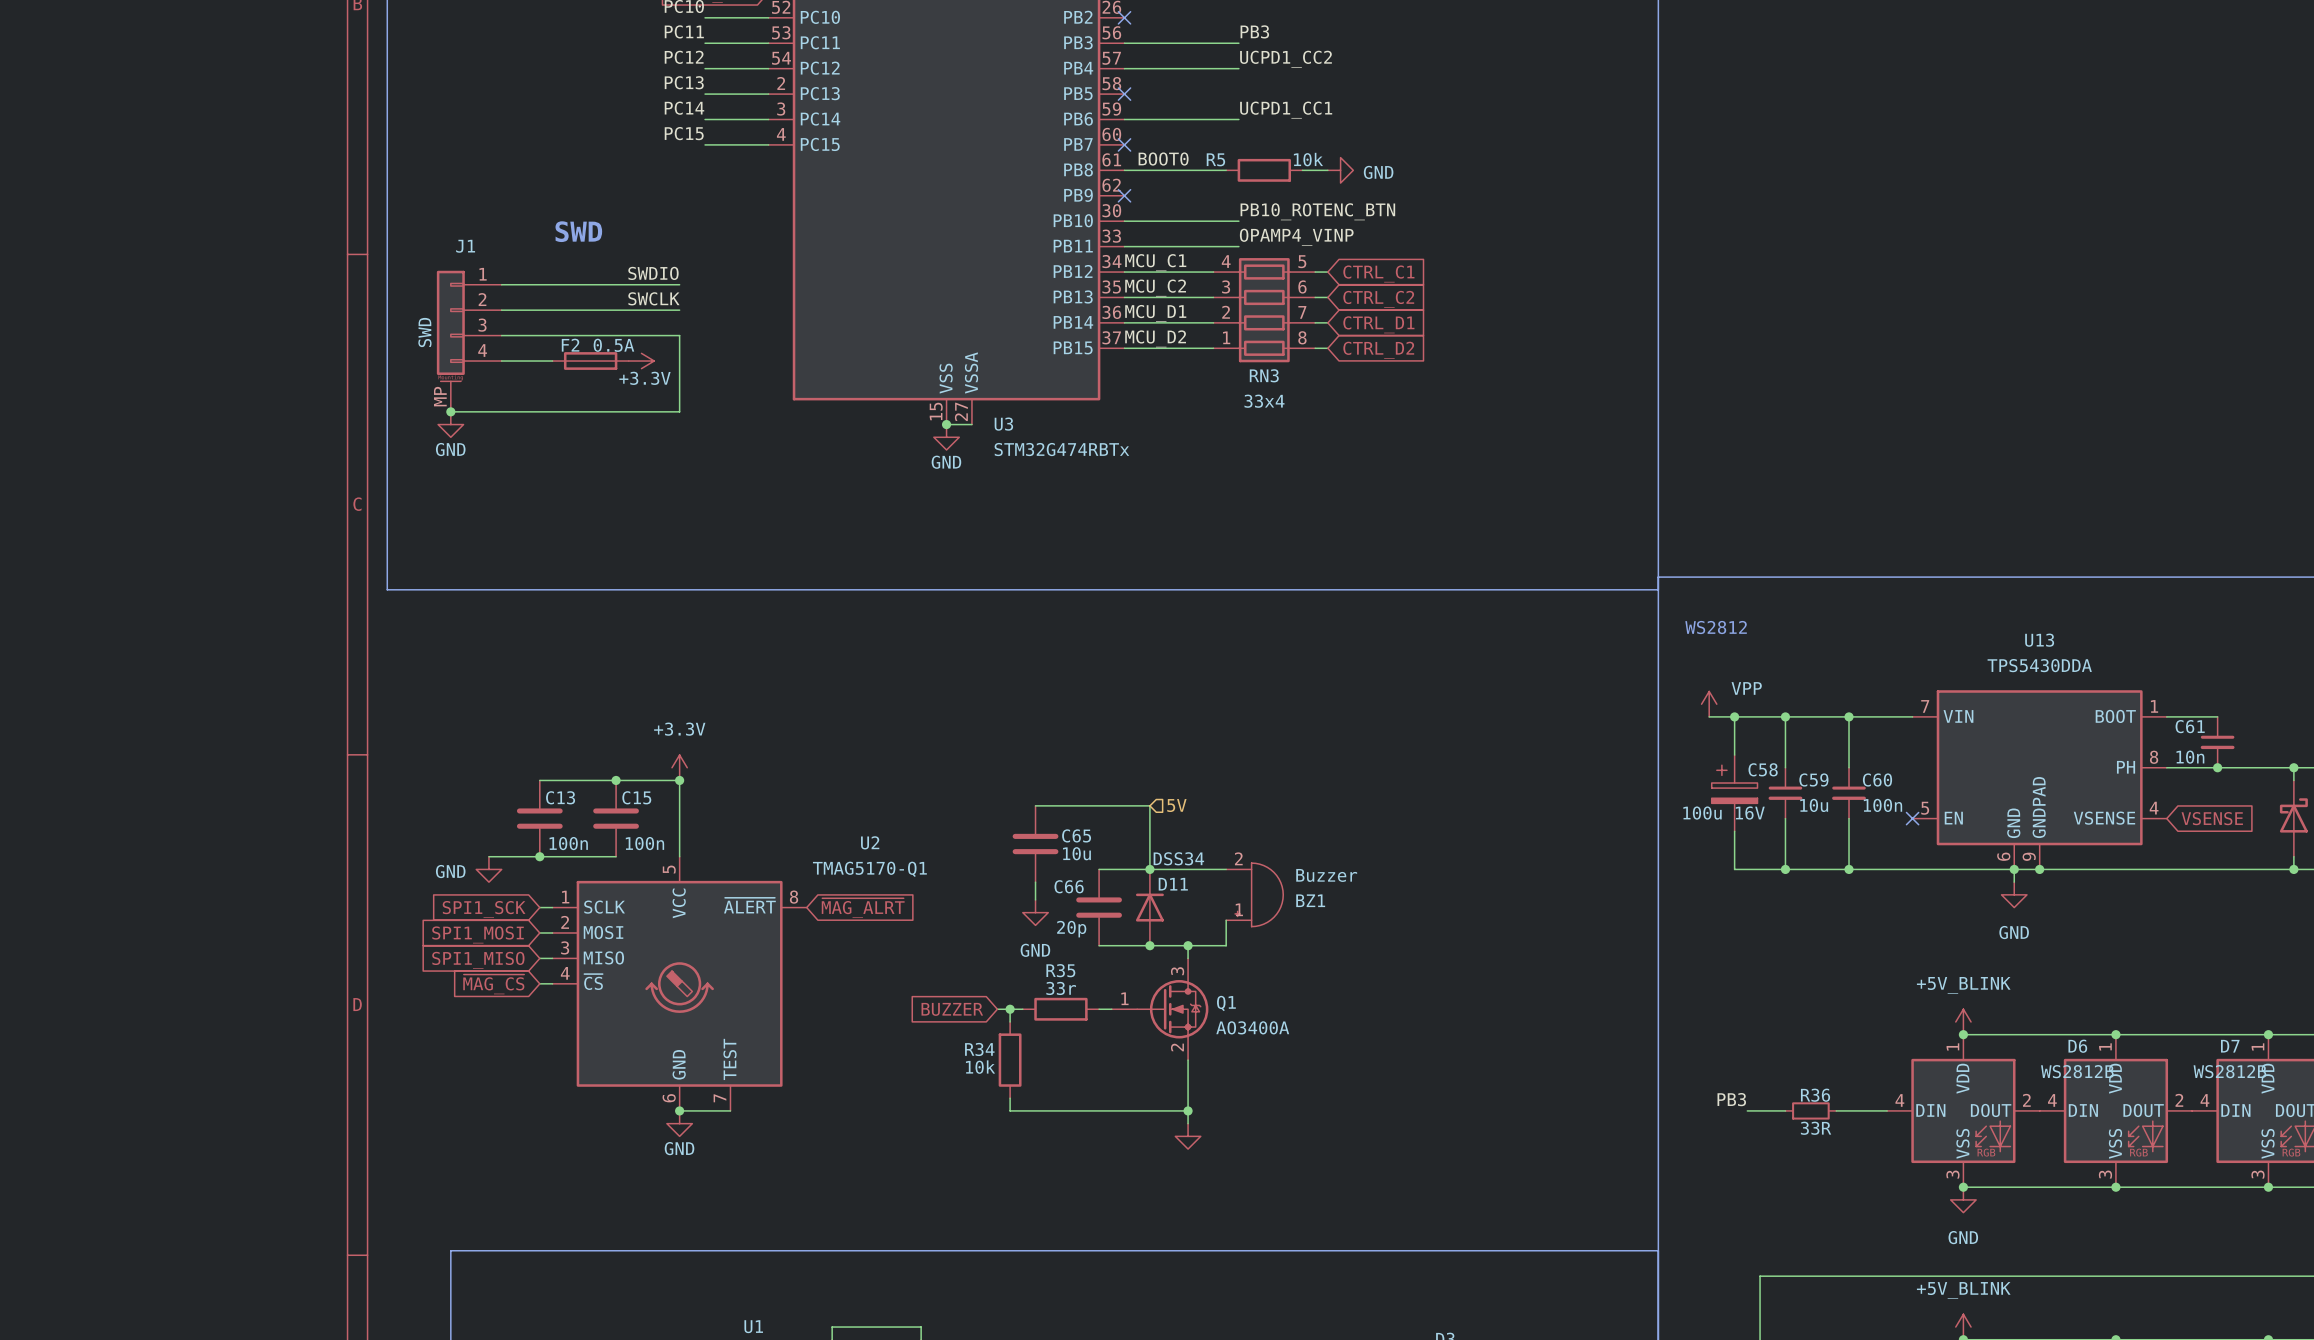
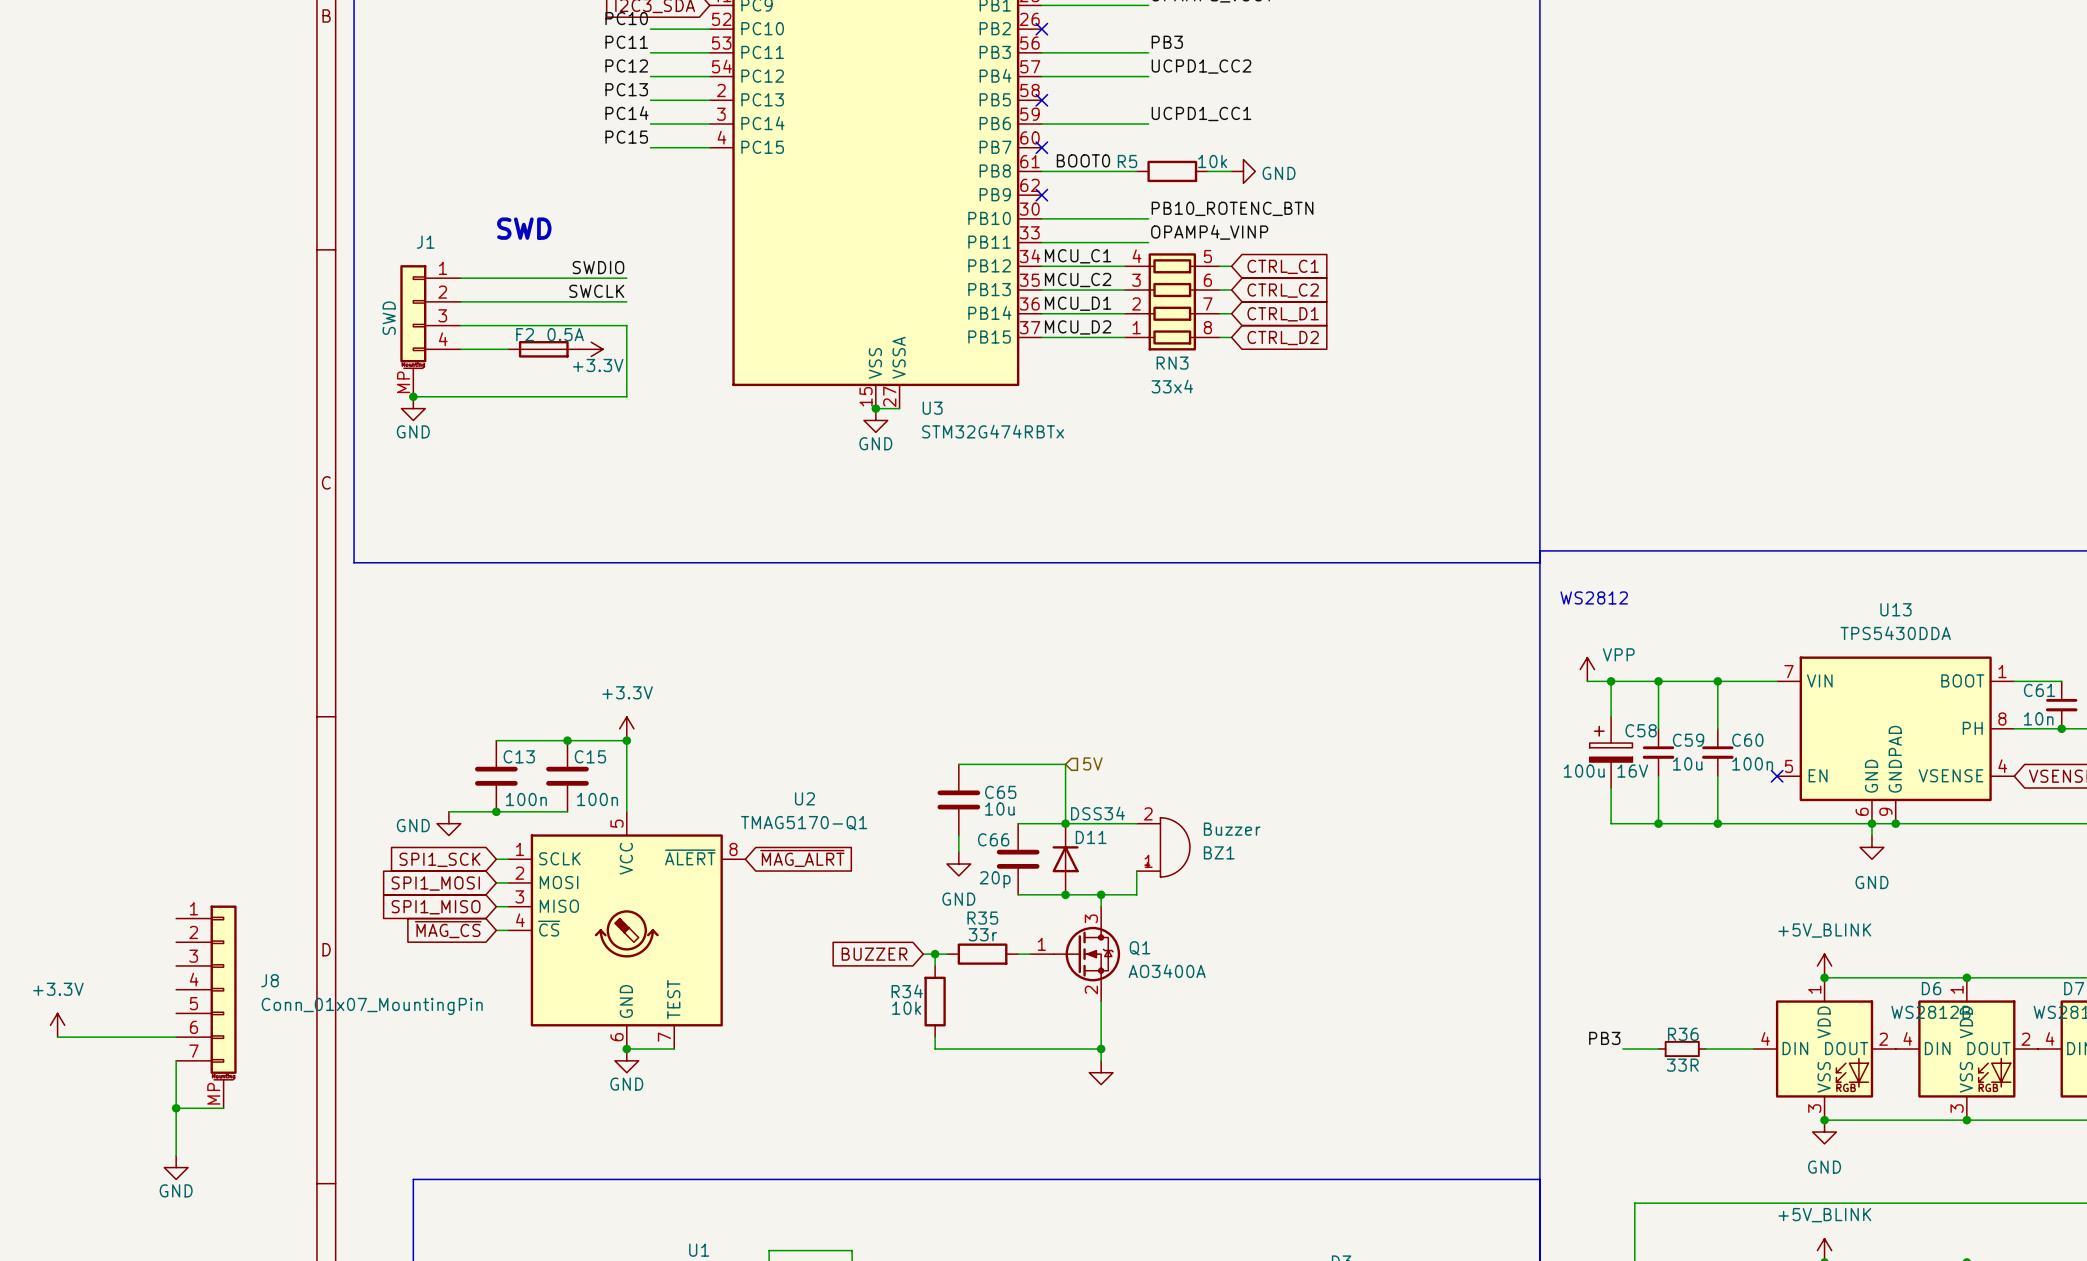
J8: none -> Conn_01x07_MountingPin (206, 1006)
power symbol: none -> +3.3V (57, 1025)
wire: none -> (57, 1037) (176, 1037)
wire: none -> (176, 1060) (176, 1155)
wire: none -> (176, 1108) (223, 1108)
junction: none -> (176, 1108)
power symbol: none -> GND (176, 1167)

